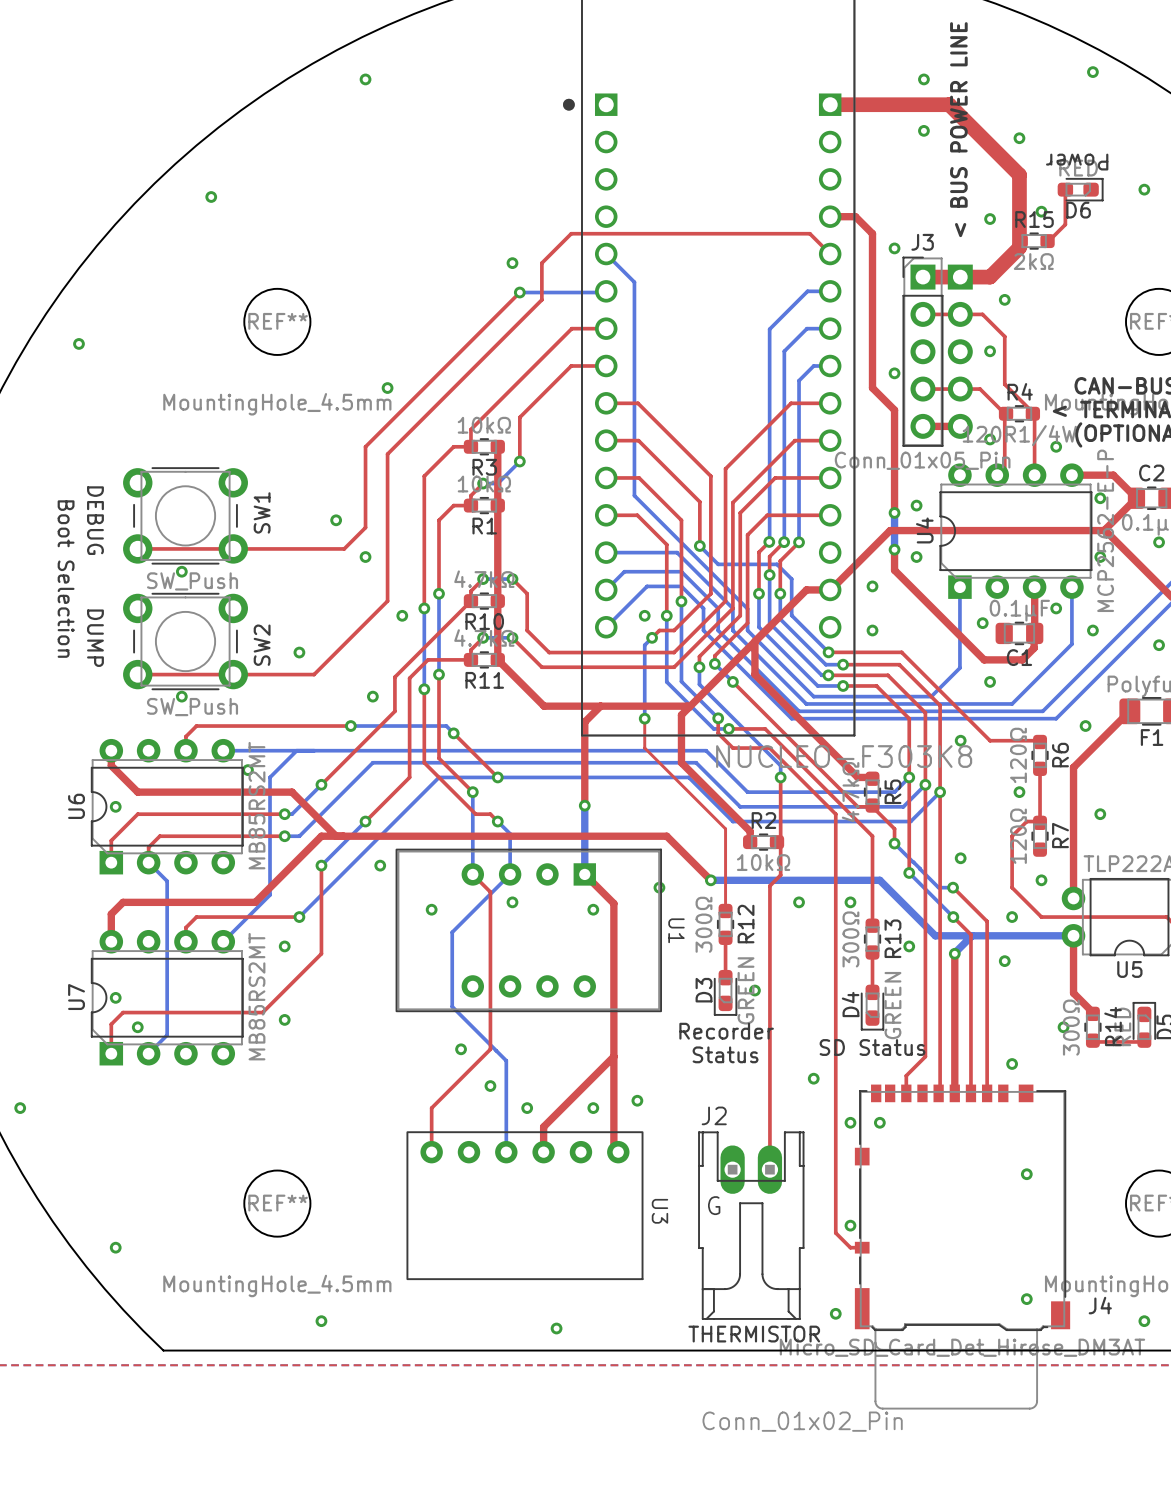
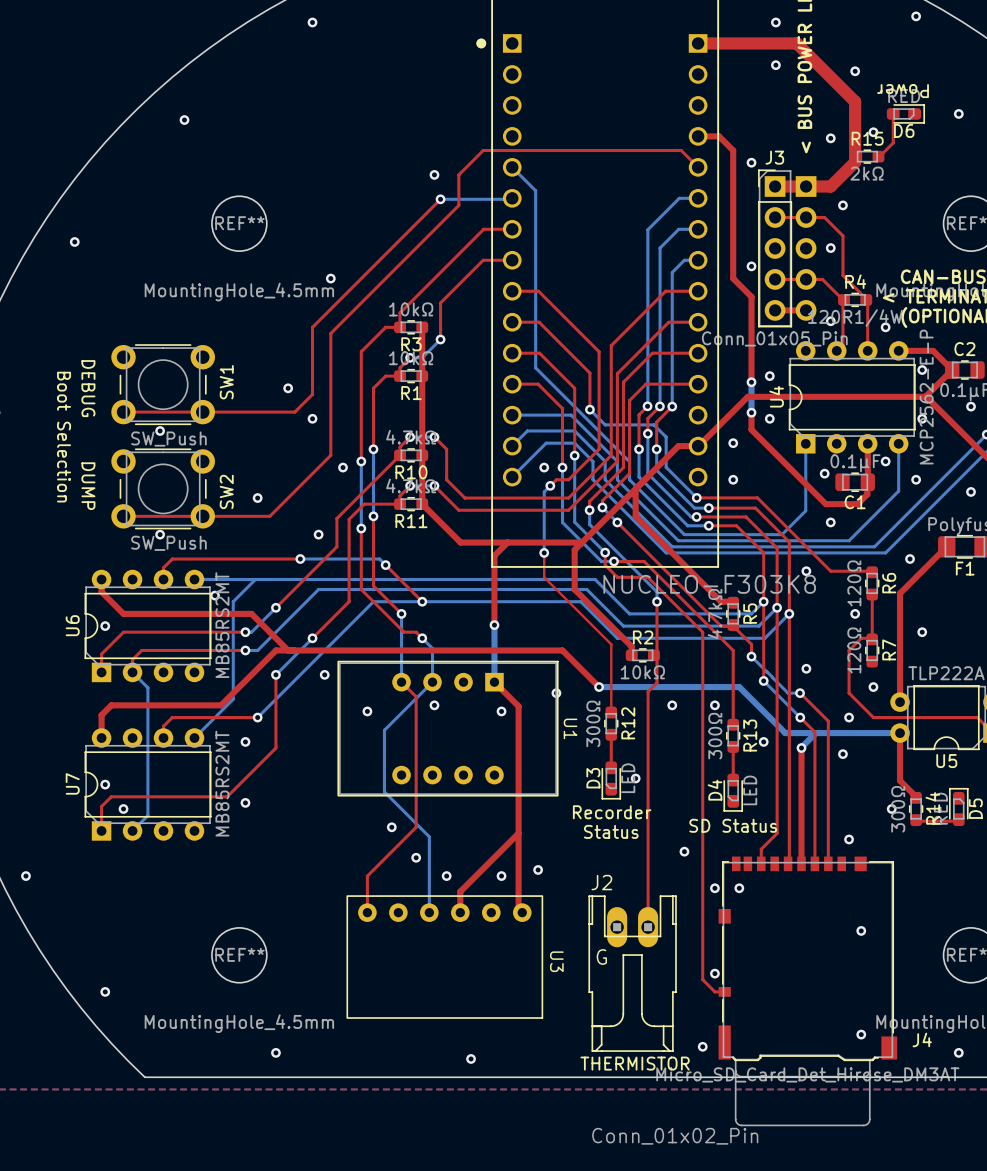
D3 value: GREEN (746, 990) -> LED (628, 778)
D4 value: GREEN (892, 1005) -> LED (750, 790)

